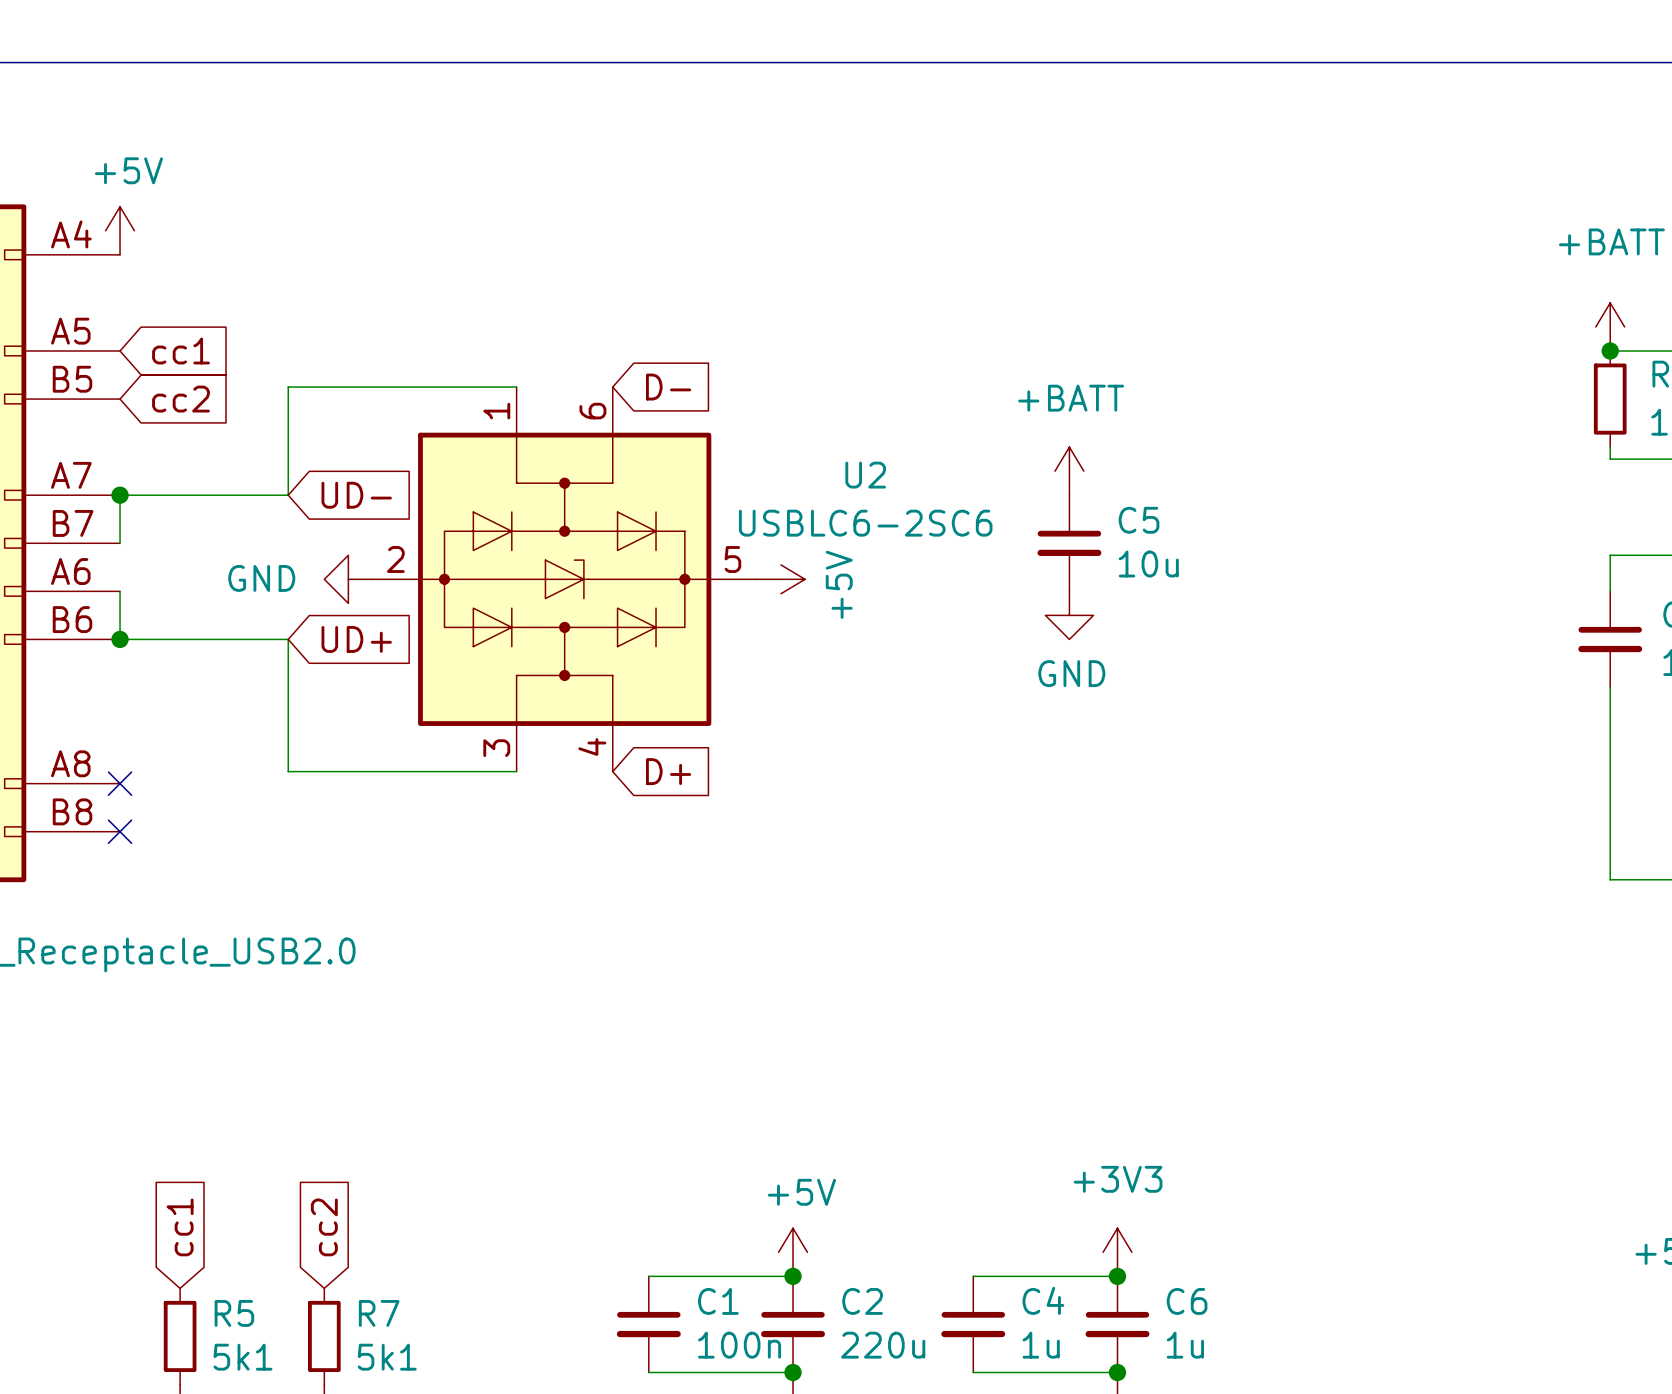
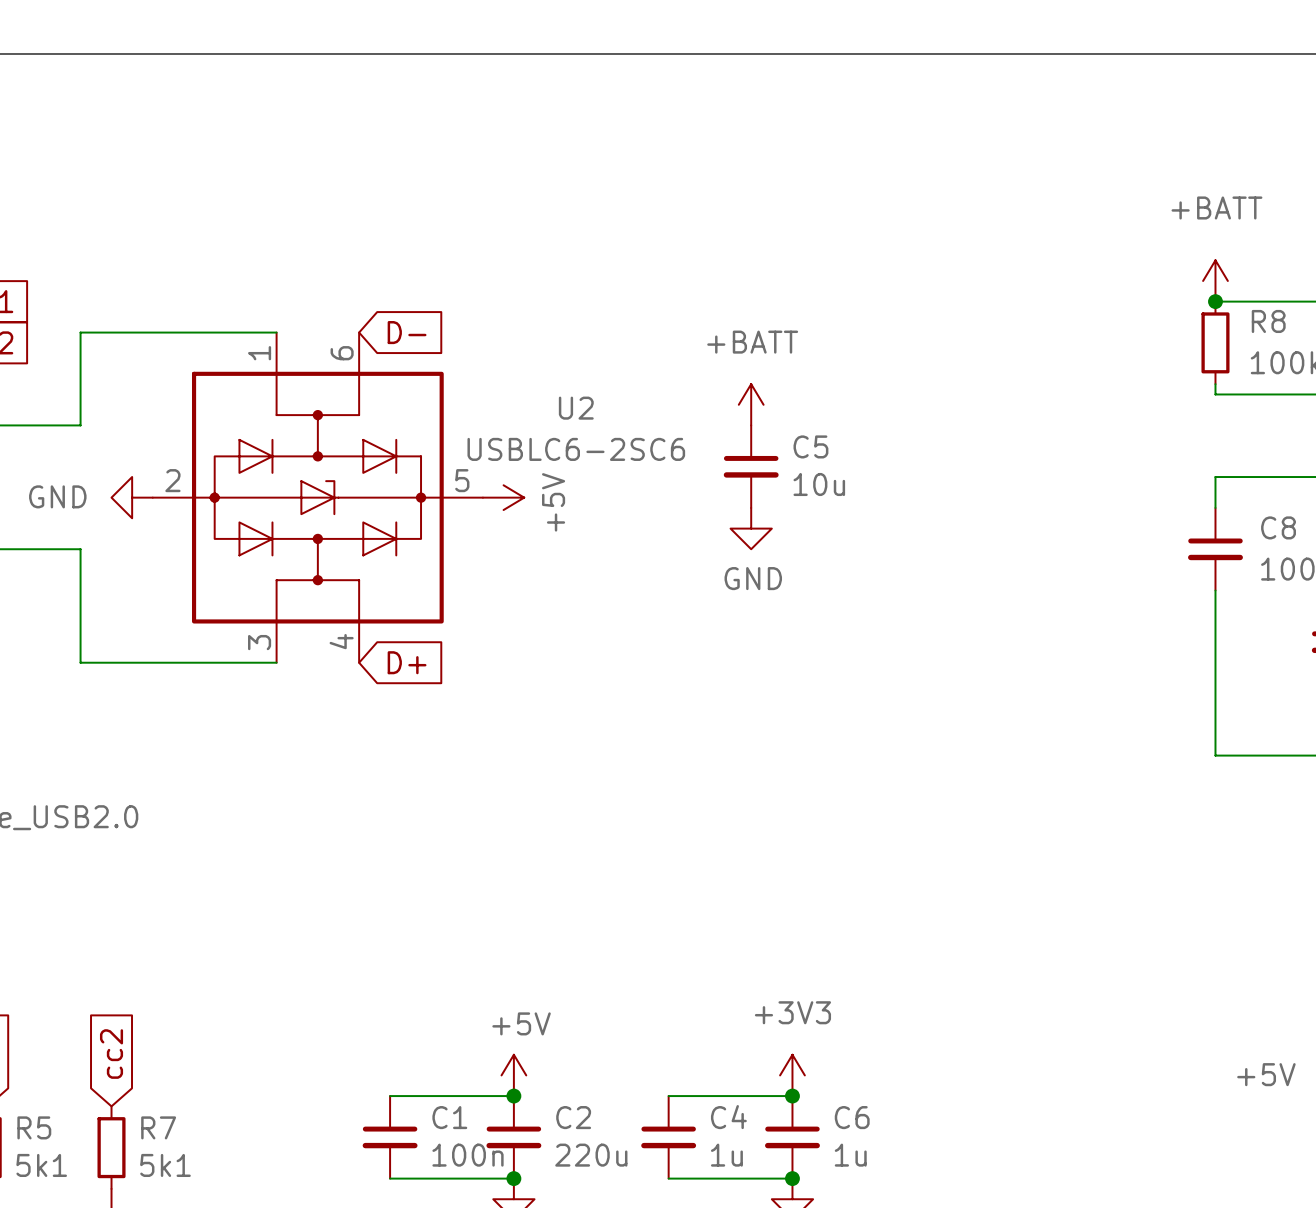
global label: UD- (356, 495) -> none
global label: UD+ (356, 639) -> none

